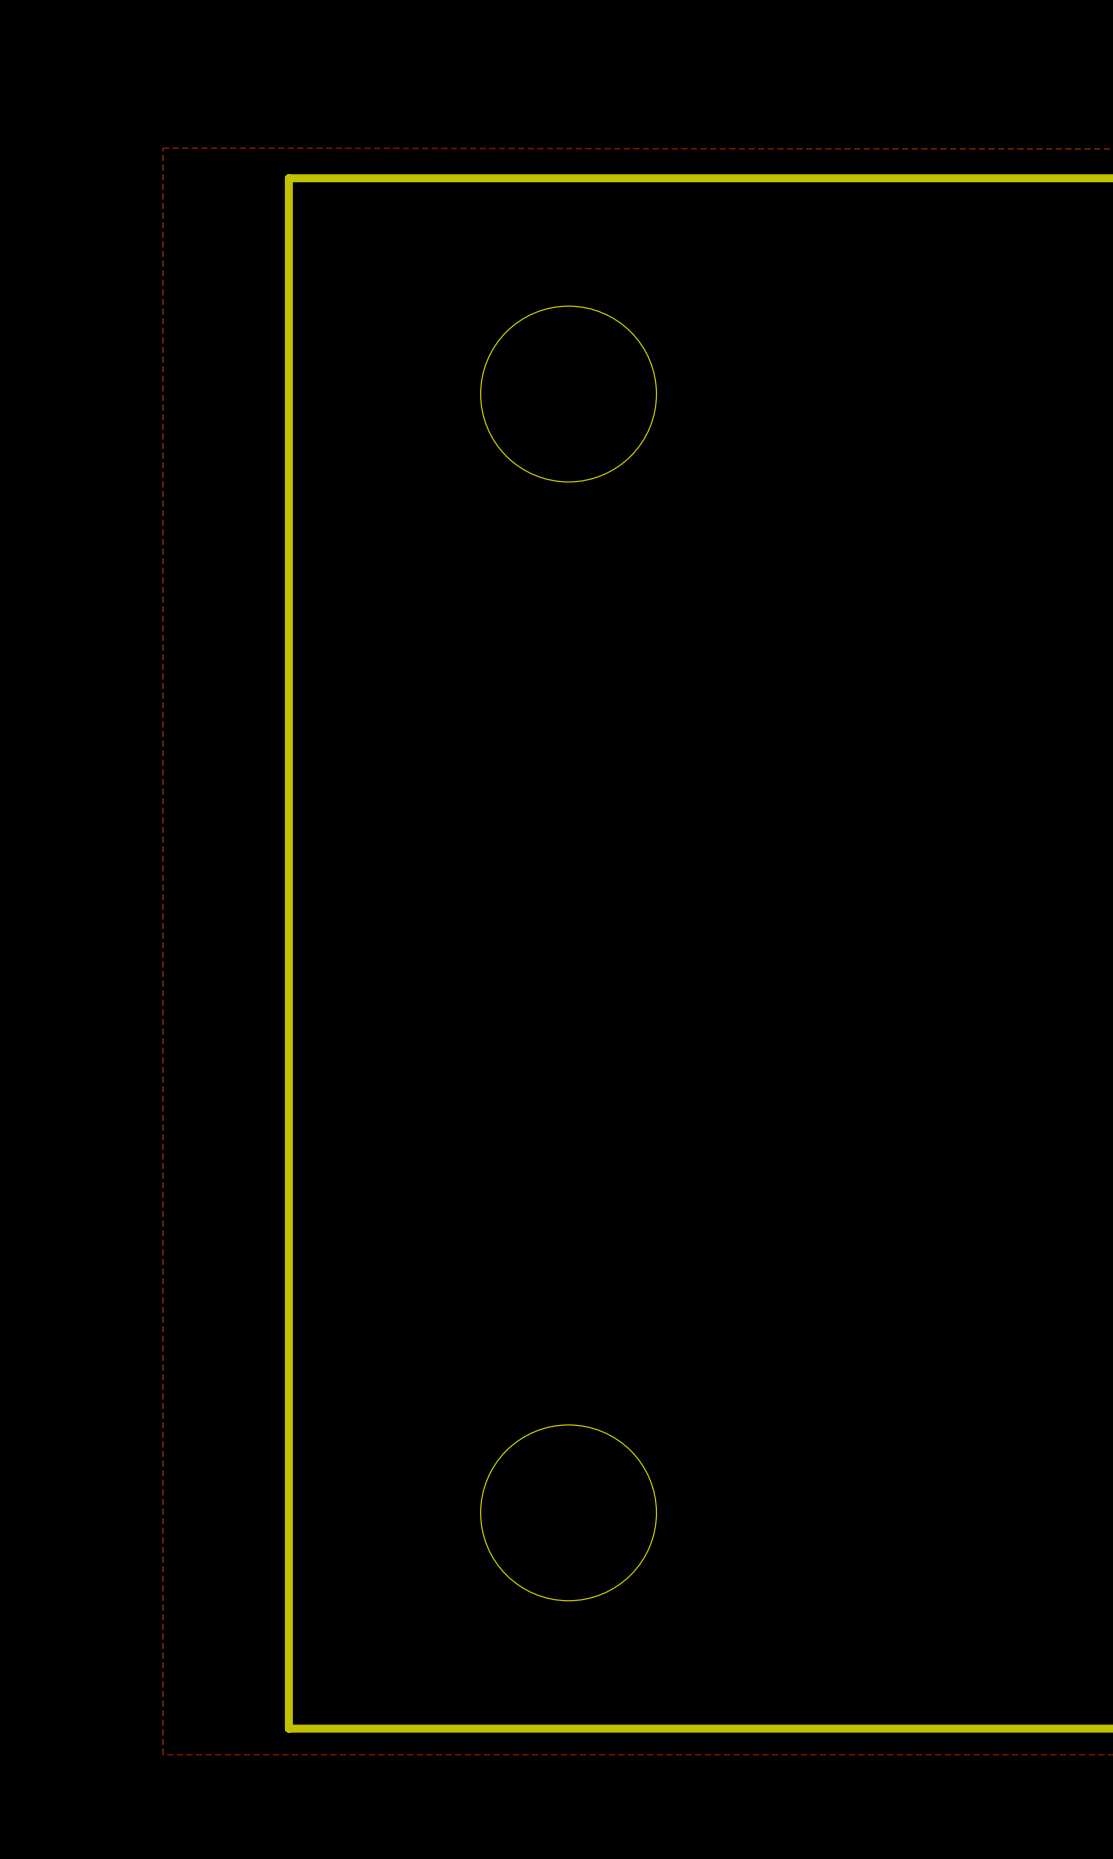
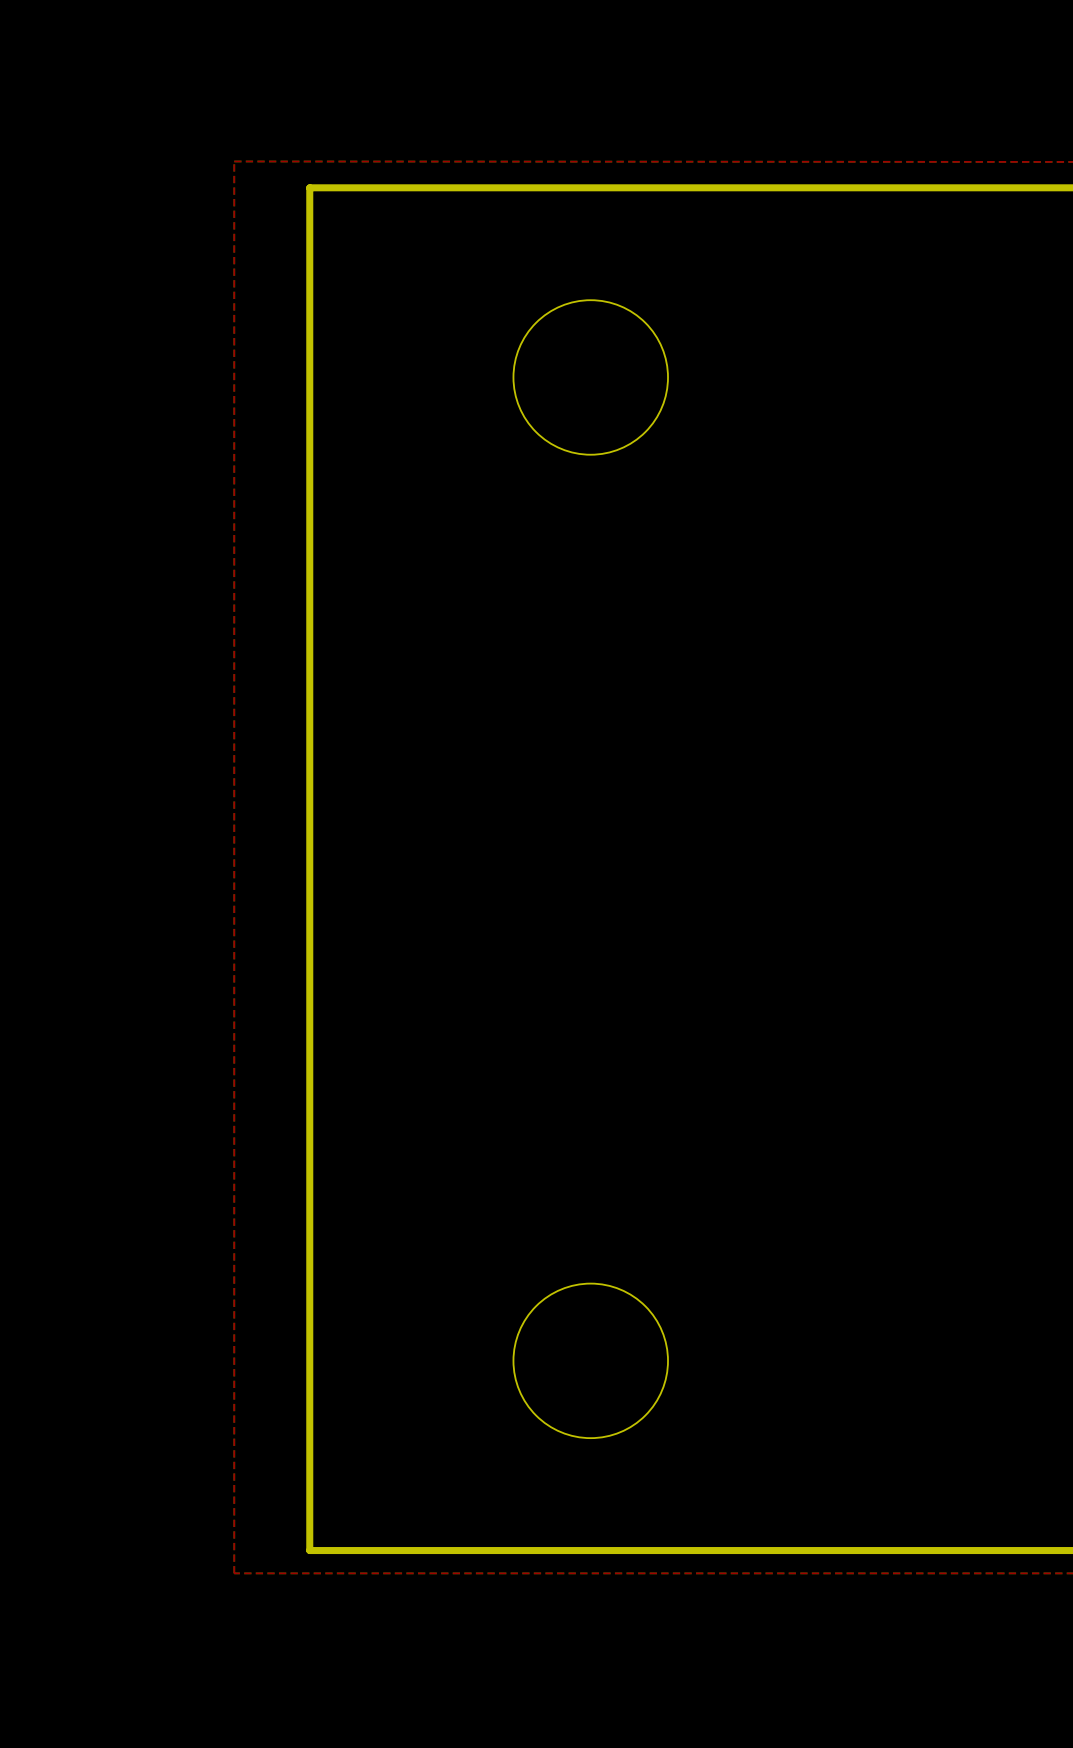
board edge: (288, 178) (288, 1728) -> (344, 187) (309, 187) (309, 1550) (344, 1550)

